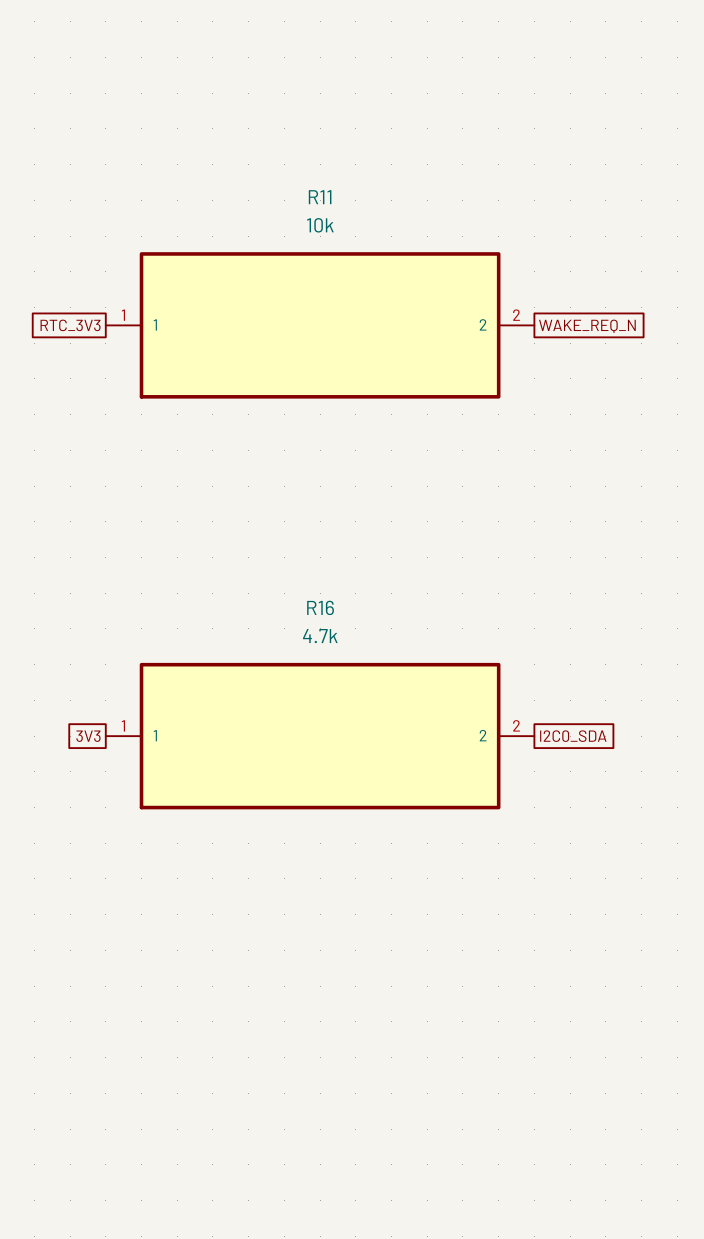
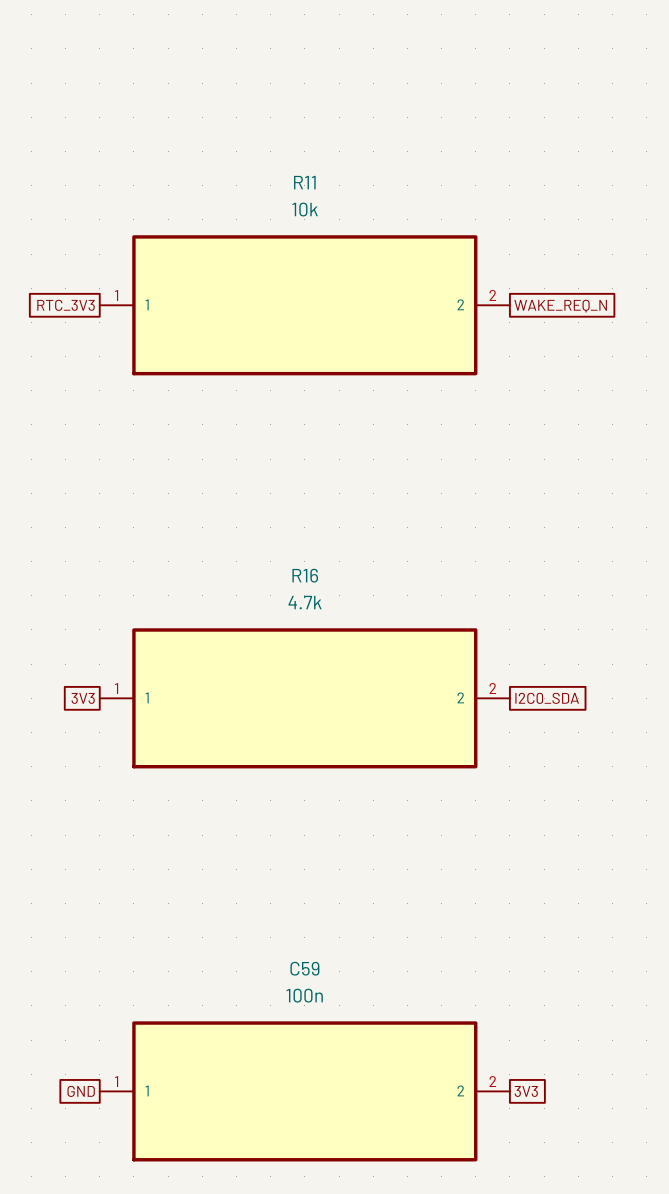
global label: none -> GND (81, 1091)
C59: none -> 100n (304, 1091)
global label: none -> 3V3 (526, 1091)

